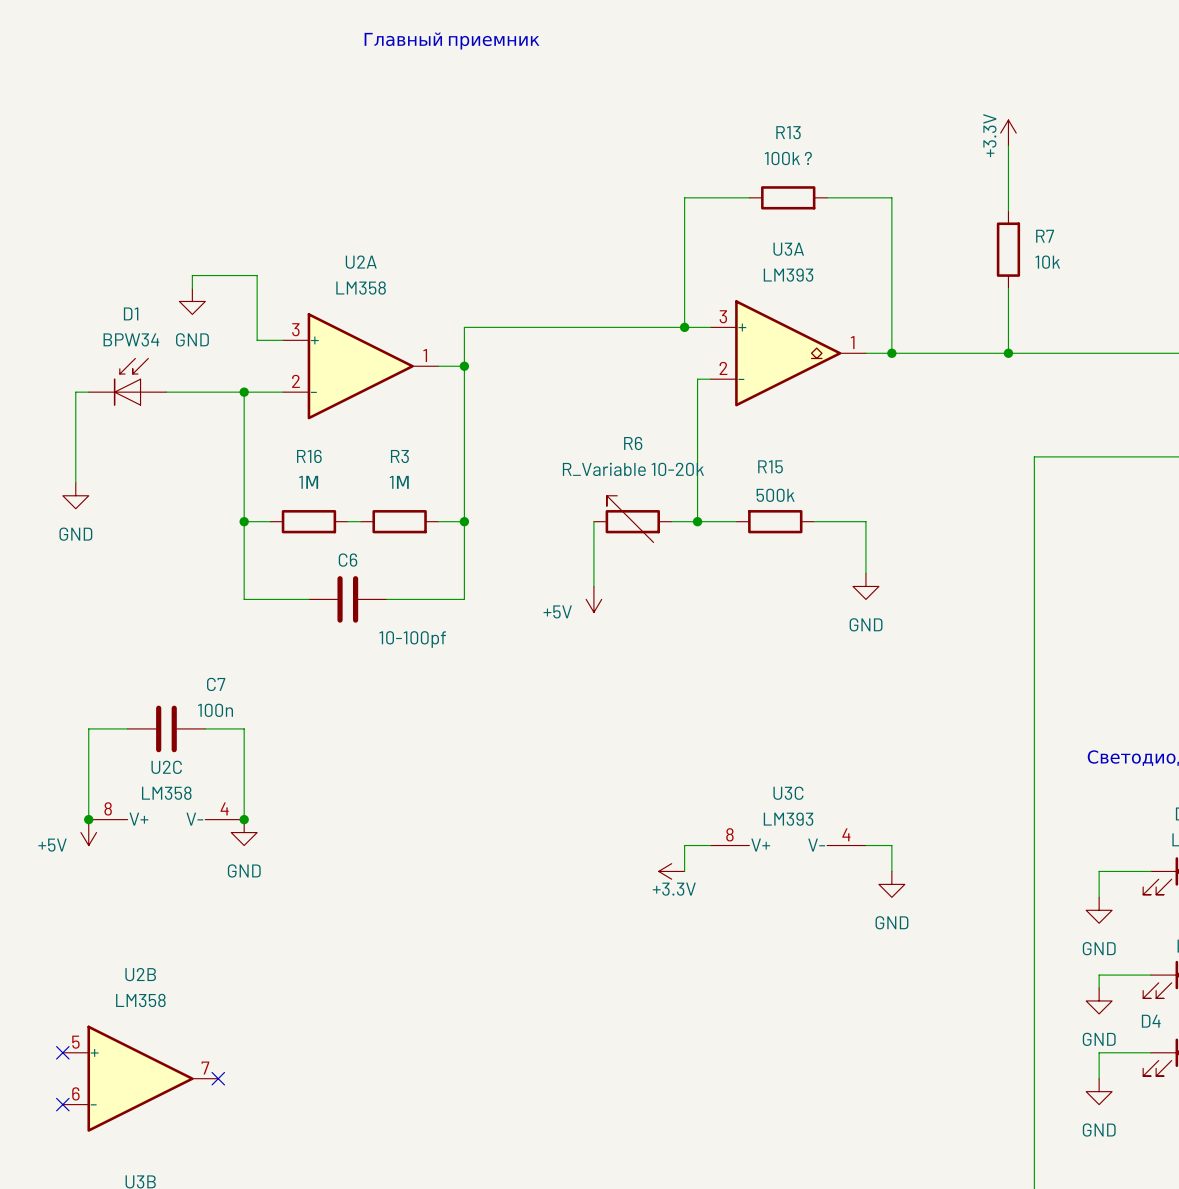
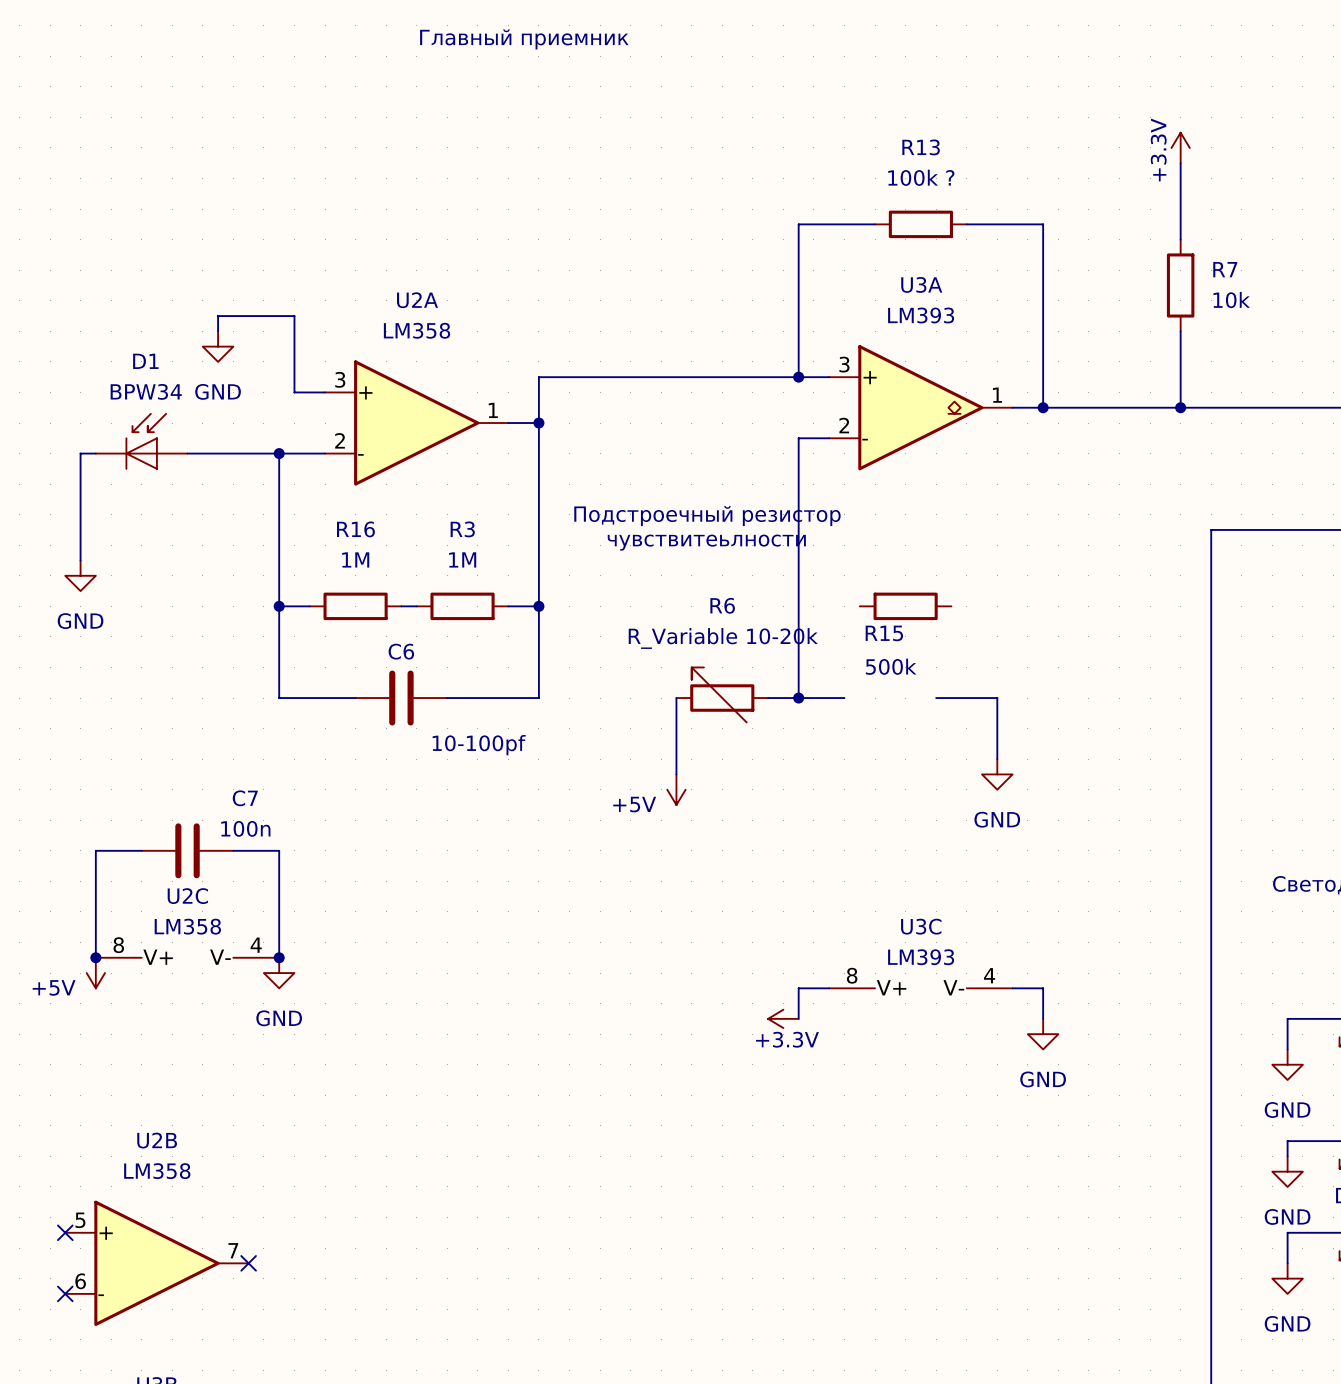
wire: (697, 379) (697, 521) -> (813, 438) (798, 438) (798, 698)
text: none -> Подстроечный резистор (707, 515)
R15 name position: R15 (770, 466) -> R15 (884, 633)
text: none -> чувствитеьлности (706, 542)
R15 value position: 500k (775, 495) -> 500k (891, 666)
R6 position: (632, 519) -> (722, 694)
wire: (593, 521) (593, 586) -> (676, 698) (676, 774)
wire: (671, 521) (736, 521) -> (768, 698) (844, 698)
junction: (697, 521) -> none
wire: (814, 521) (865, 521) (865, 573) -> (936, 698) (997, 698) (997, 759)
power symbol position: GND (865, 586) -> GND (997, 774)
power symbol position: +5V (593, 599) -> +5V (676, 789)
junction: none -> (798, 698)

